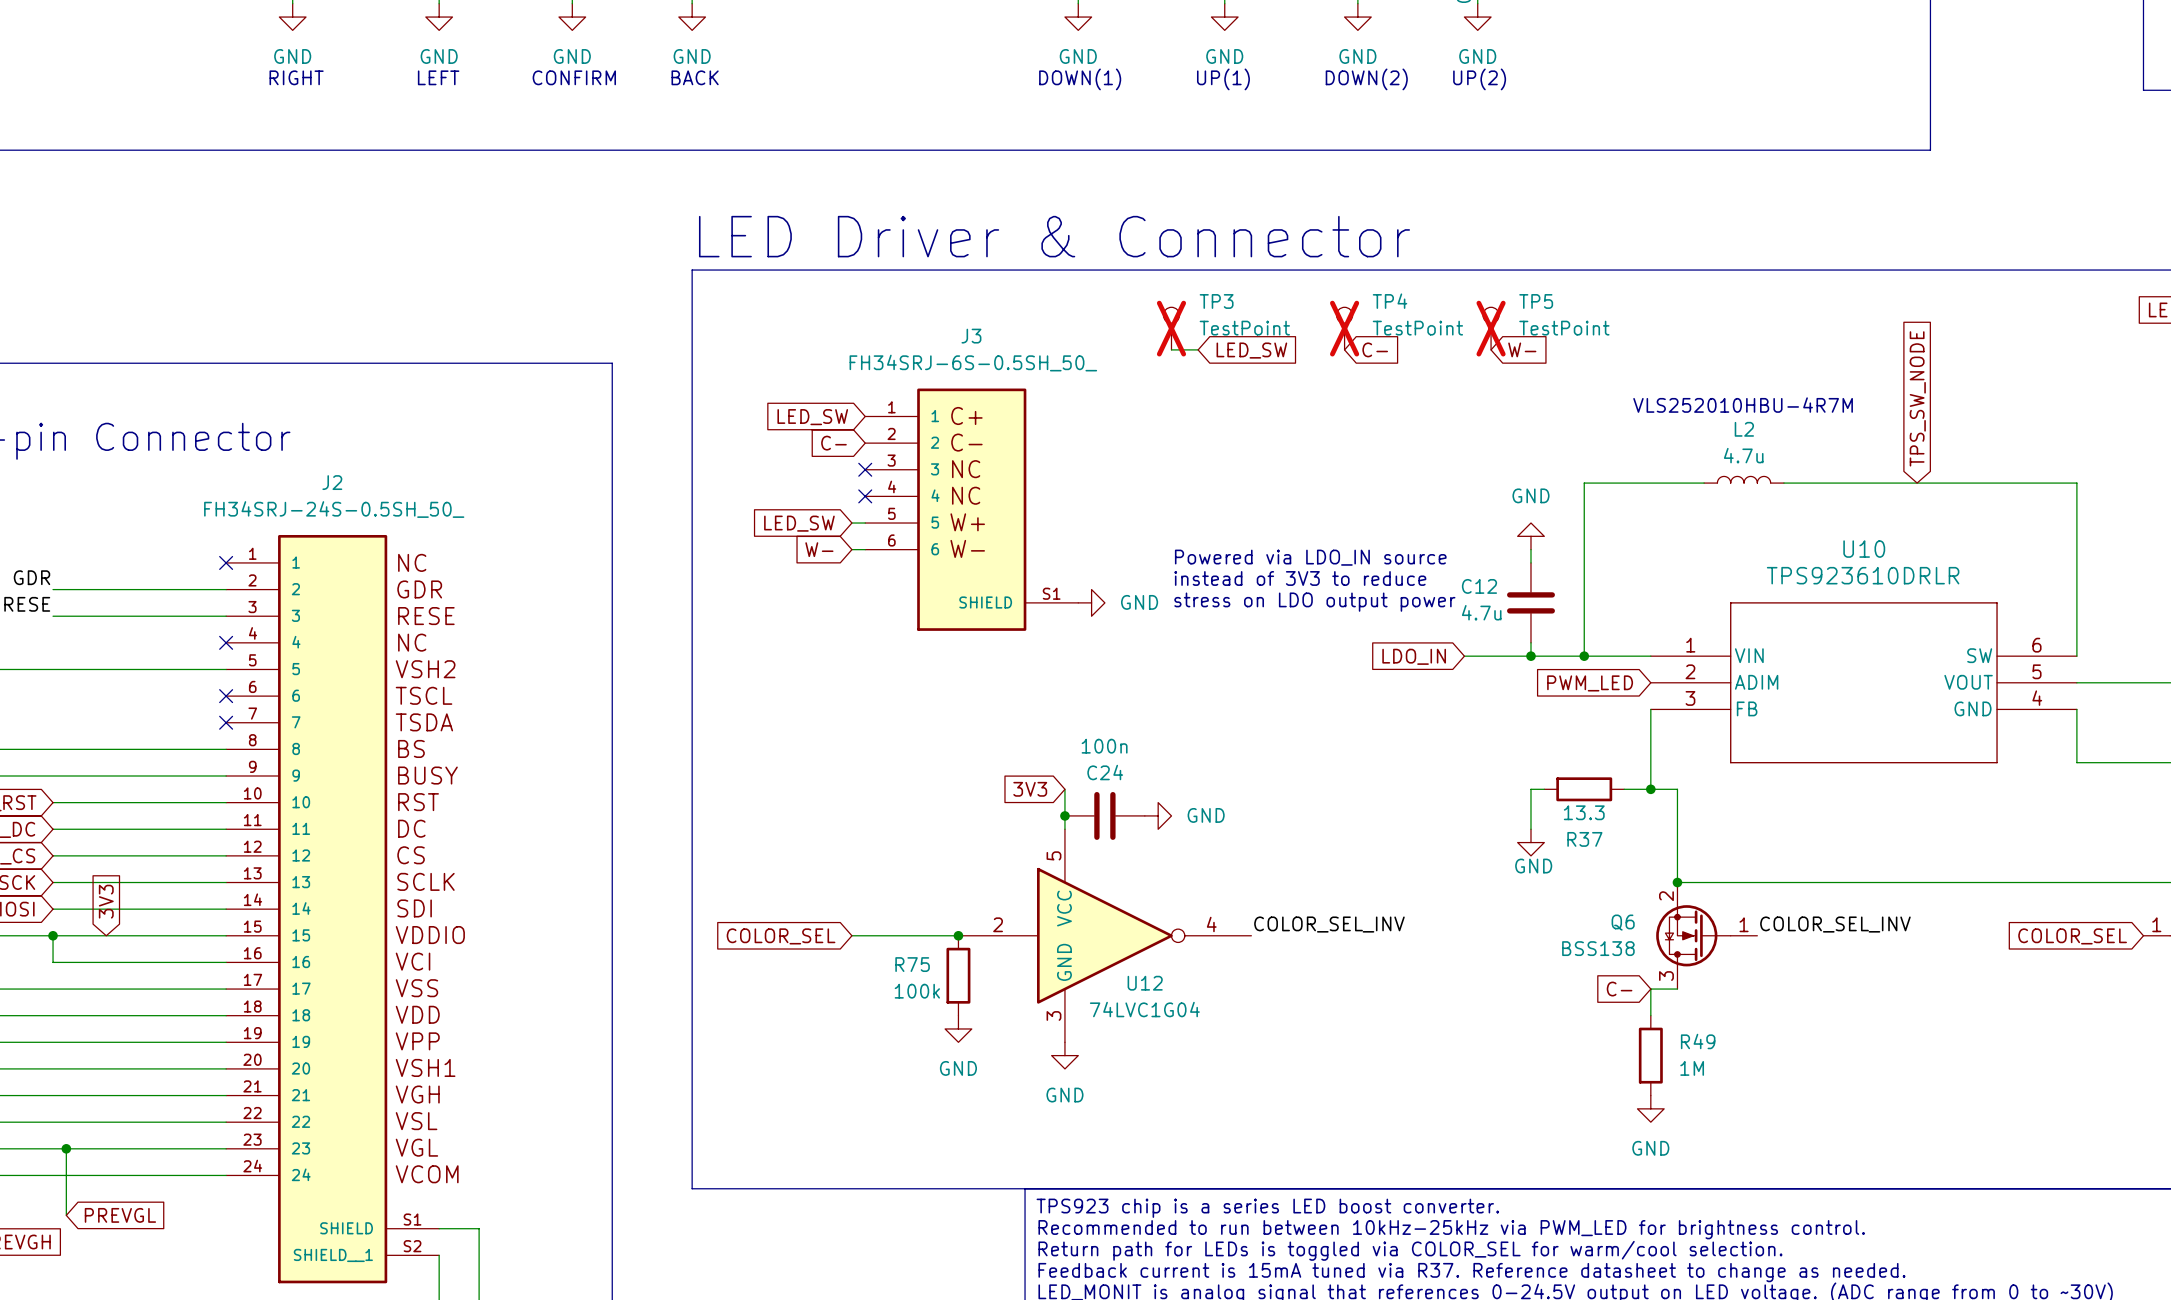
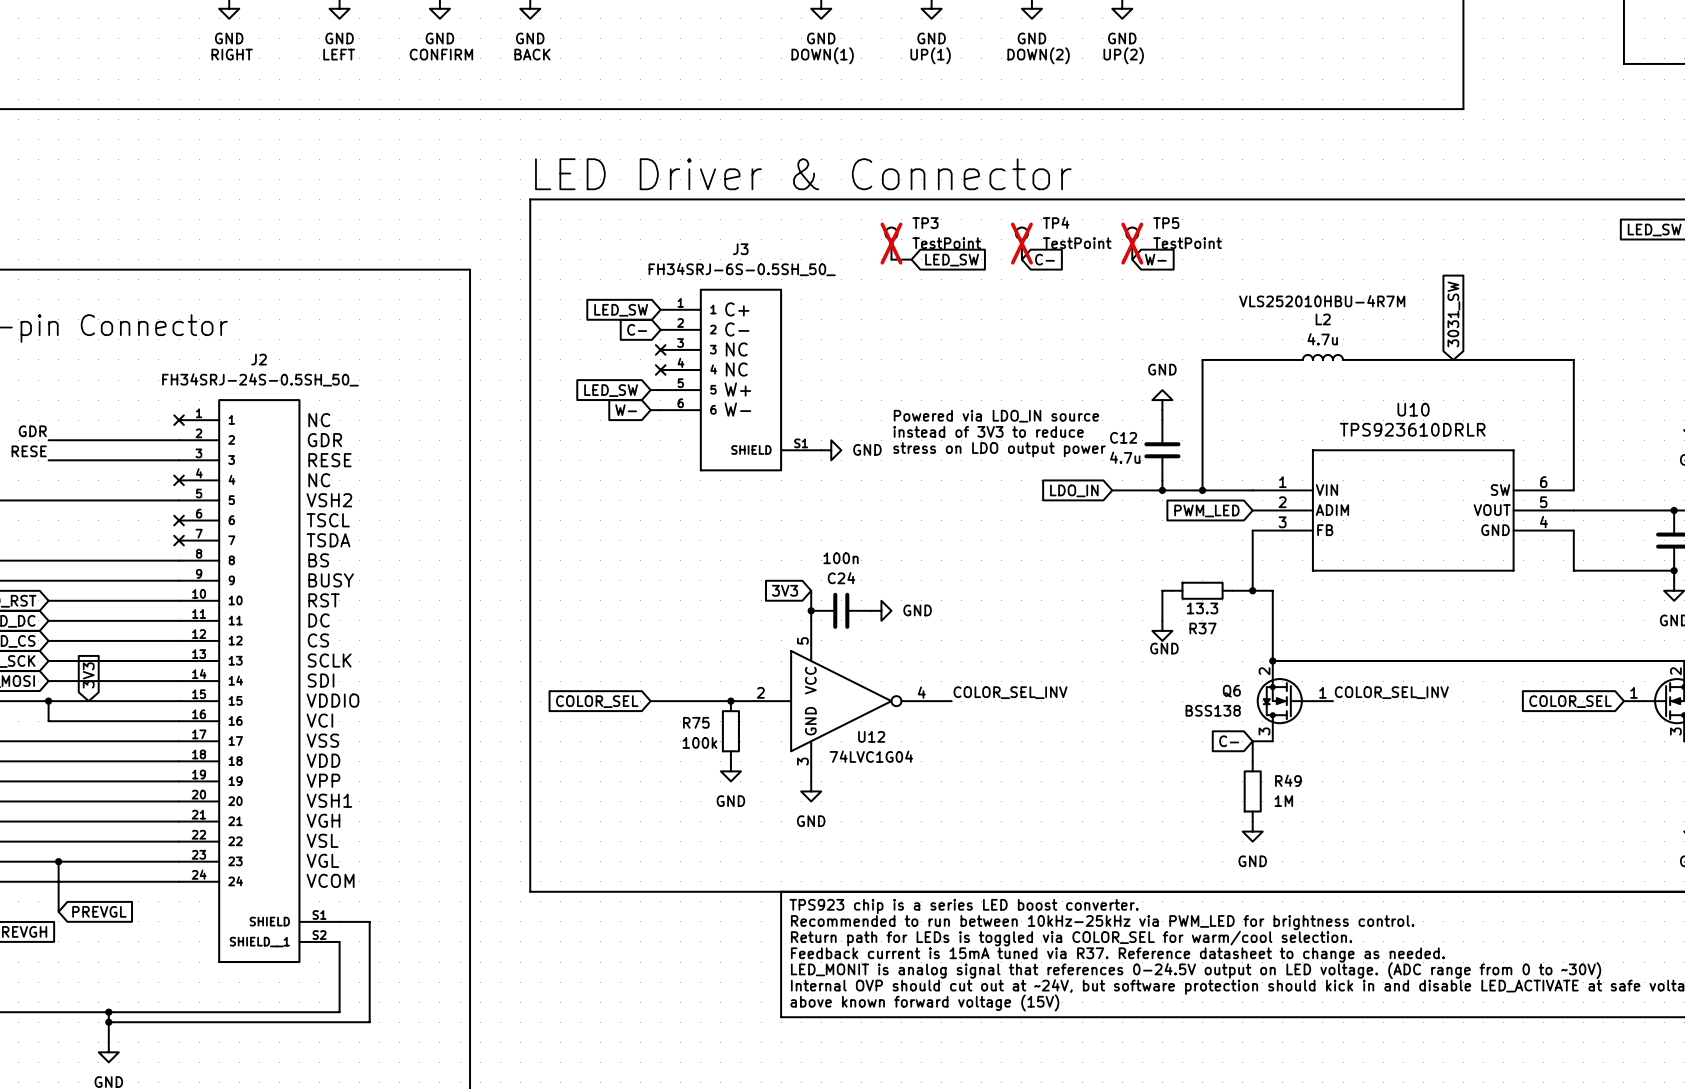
global label: TPS_SW_NODE (1917, 398) -> 3031_SW (1453, 314)

